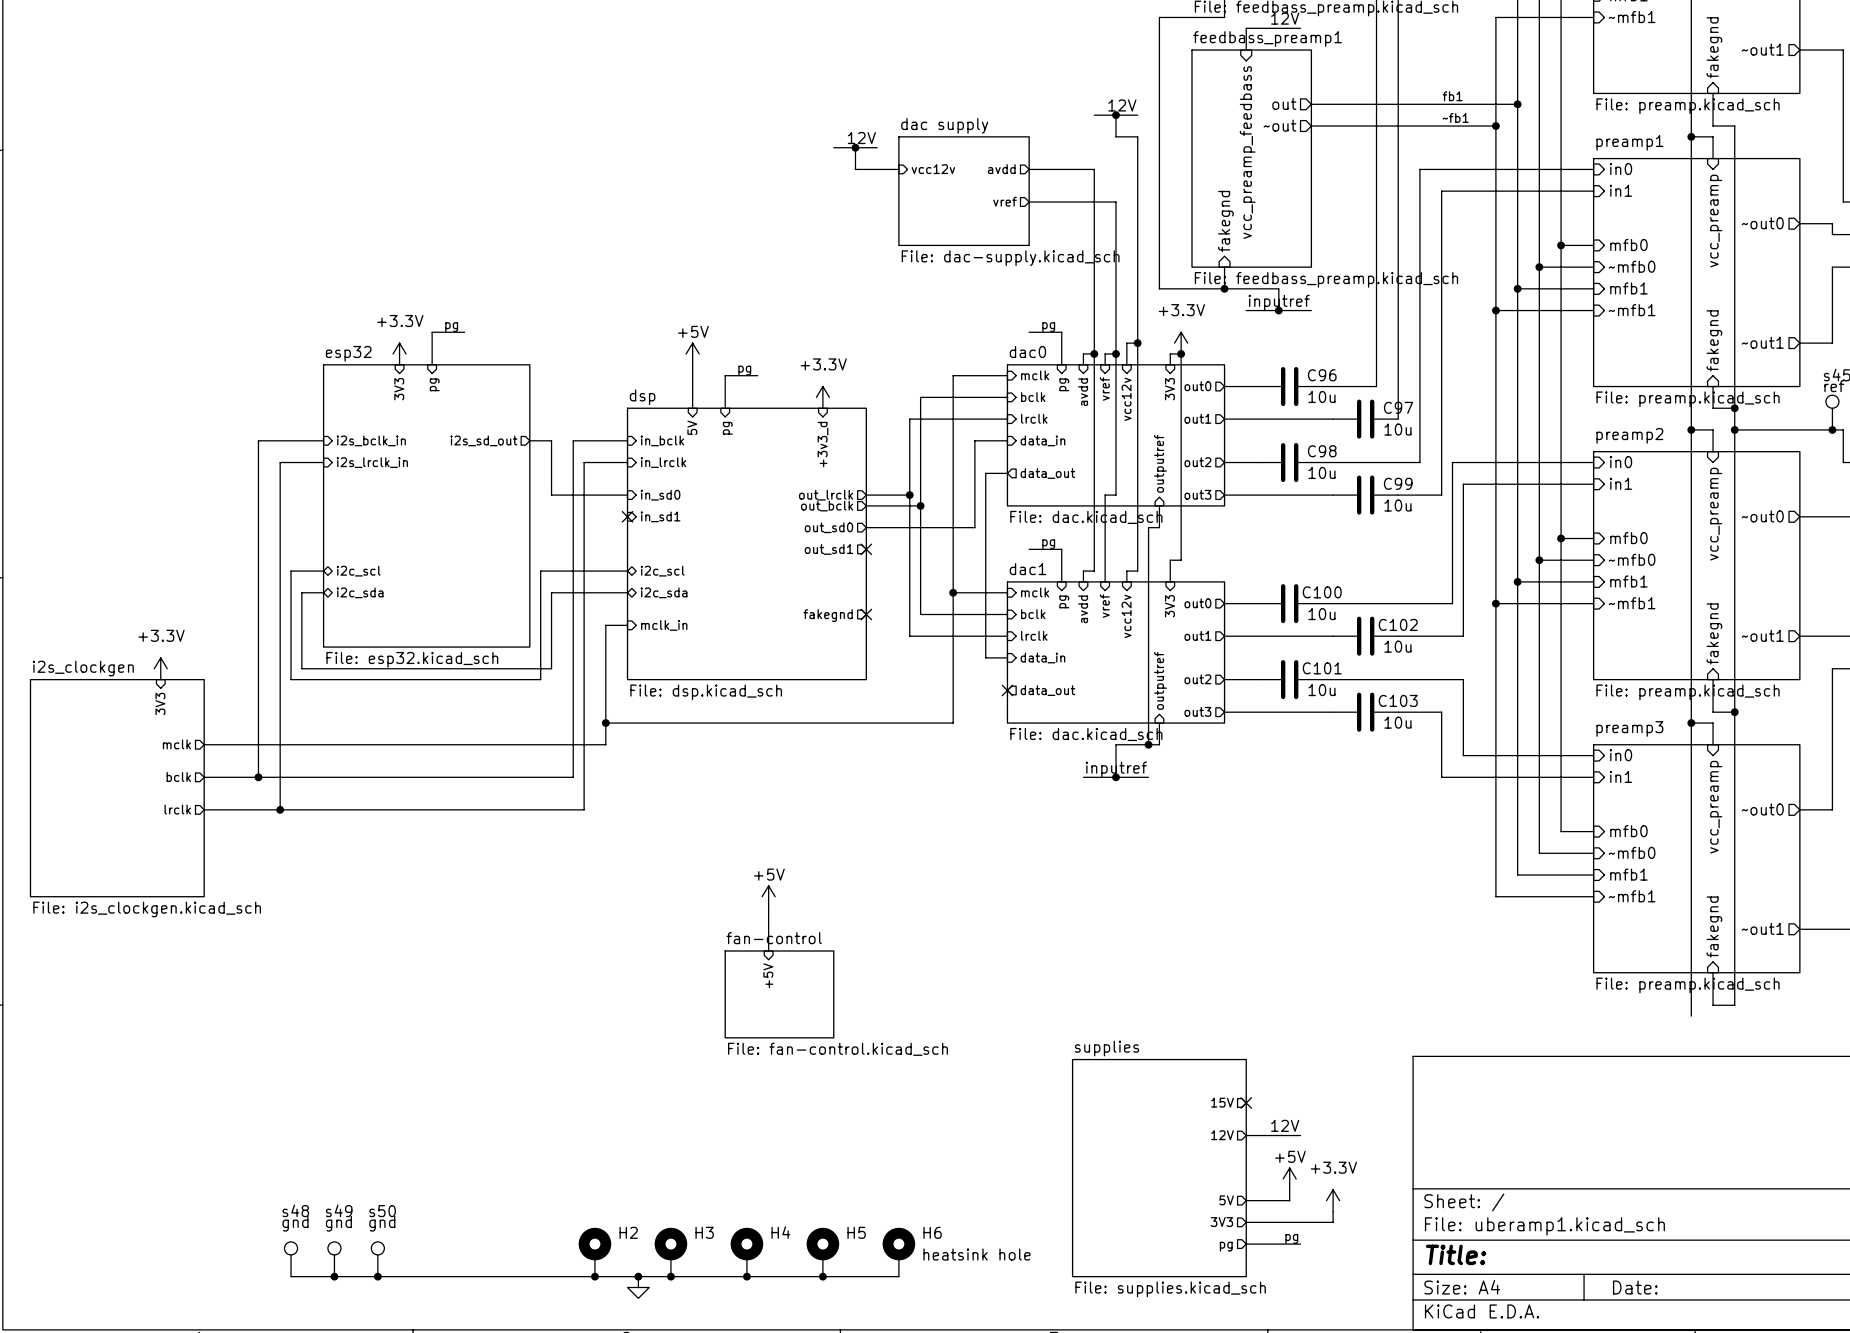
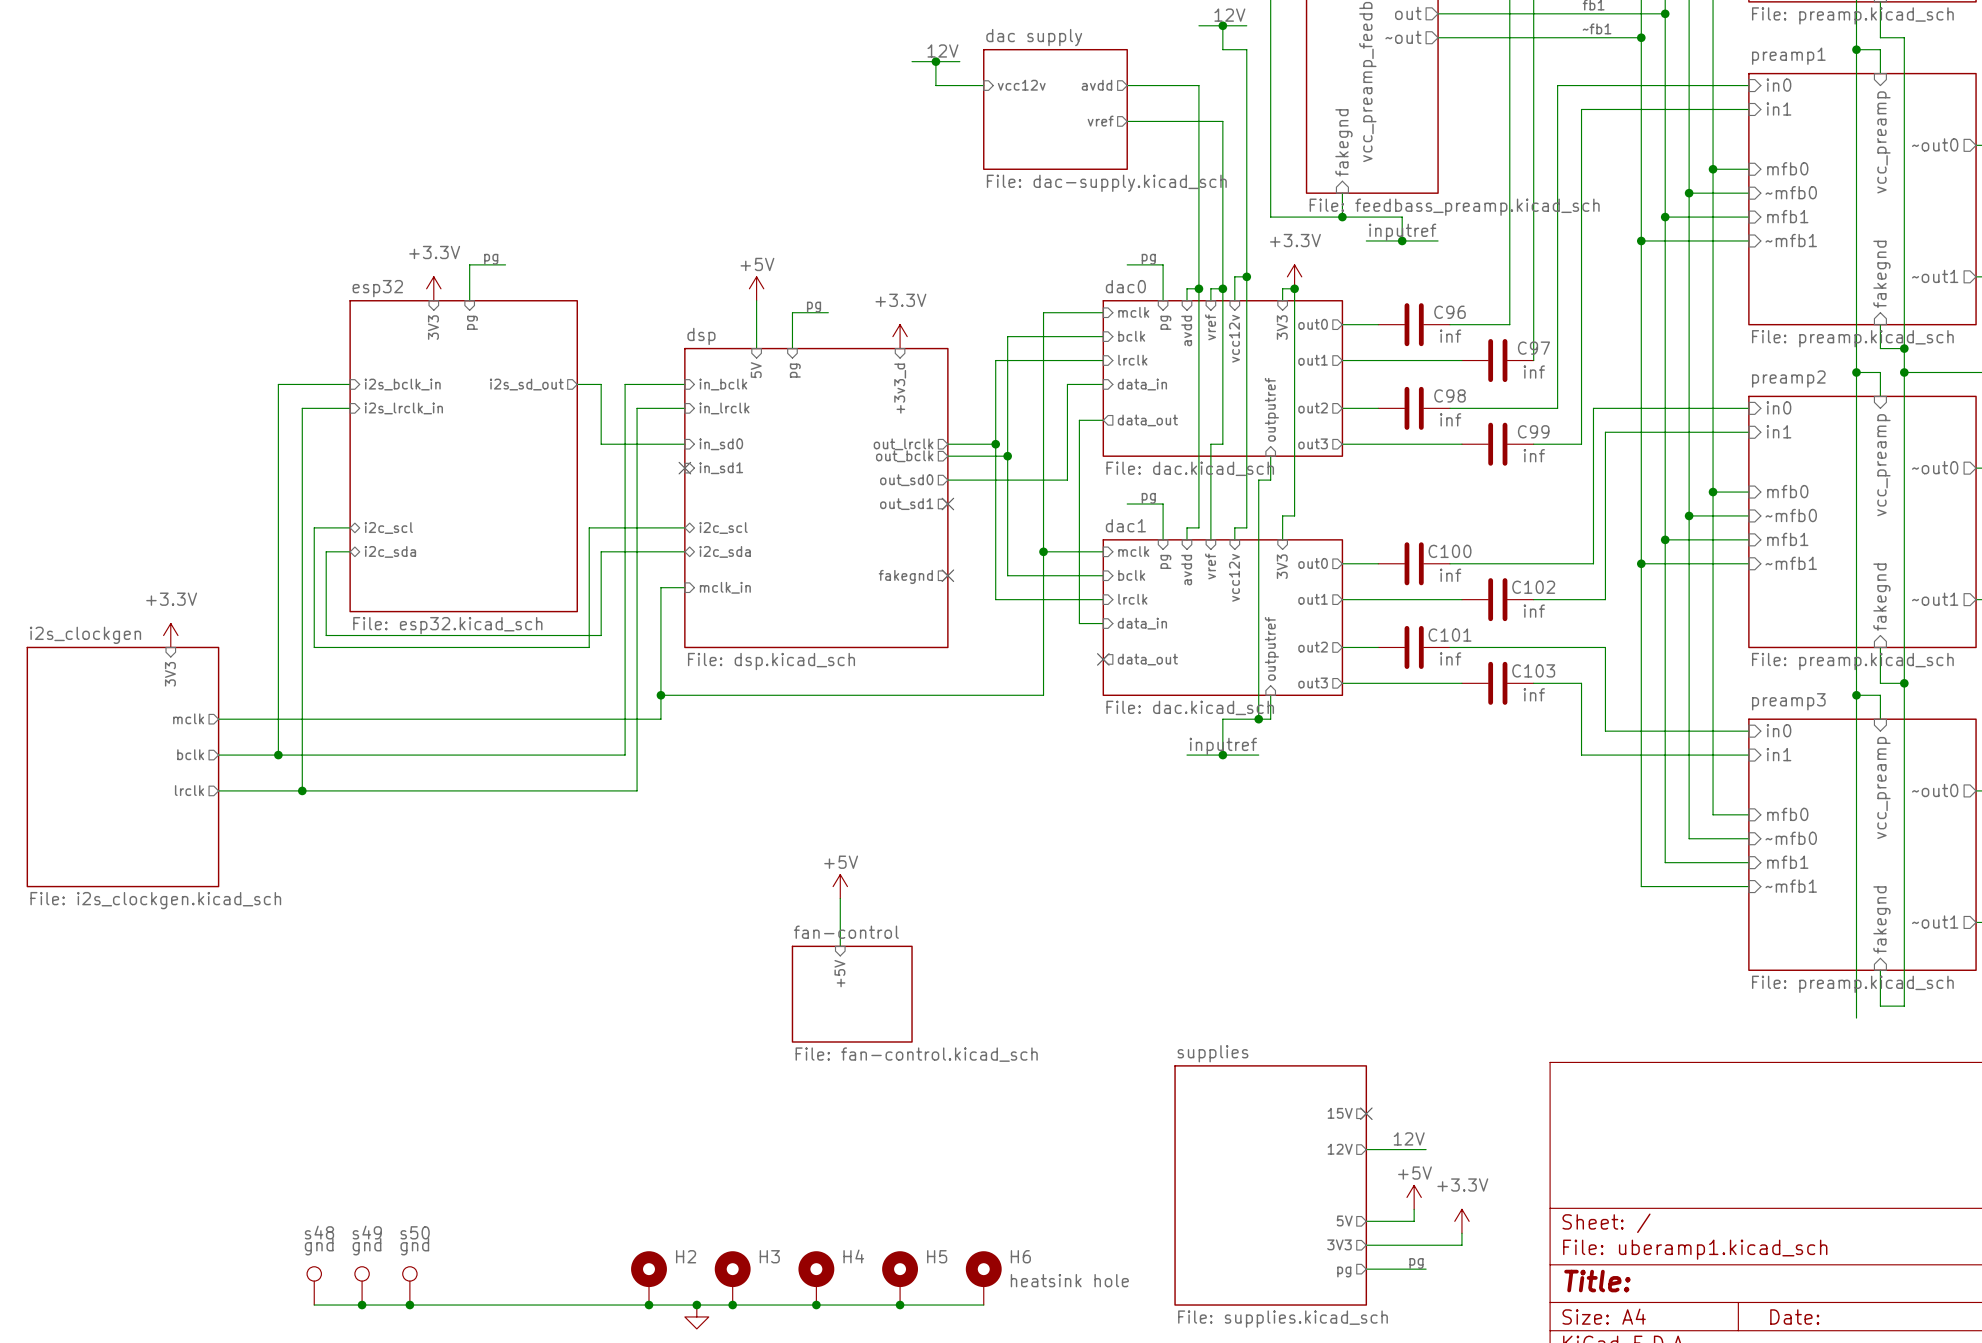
C96 value: 10u (1321, 396) -> inf (1450, 336)
C97 value: 10u (1397, 429) -> inf (1534, 372)
C98 value: 10u (1321, 472) -> inf (1450, 419)
C99 value: 10u (1397, 505) -> inf (1534, 455)
C100 value: 10u (1321, 614) -> inf (1450, 575)
C102 value: 10u (1397, 646) -> inf (1534, 611)
C101 value: 10u (1321, 690) -> inf (1450, 658)
C103 value: 10u (1397, 722) -> inf (1534, 694)

